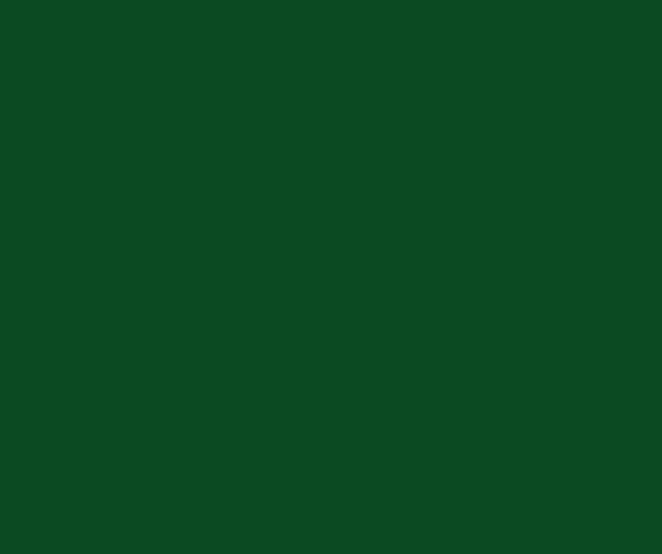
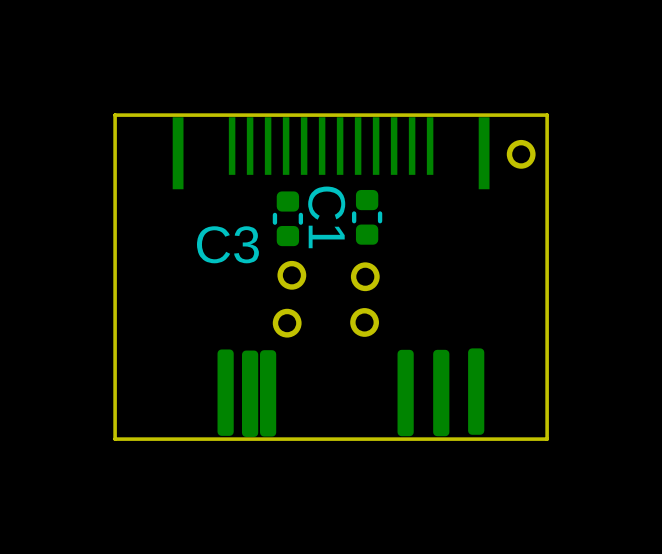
board edge: none -> (547, 115) (115, 115) (115, 439) (547, 439) (547, 115)
part: none -> (331, 153)
part: none -> (521, 154)
C1: none -> (367, 217)
C3: none -> (287, 218)
part: none -> (291, 275)
part: none -> (365, 276)
part: none -> (364, 322)
part: none -> (287, 323)
part: none -> (476, 391)
part: none -> (225, 392)
part: none -> (250, 393)
part: none -> (268, 393)
part: none -> (405, 393)
part: none -> (441, 393)

